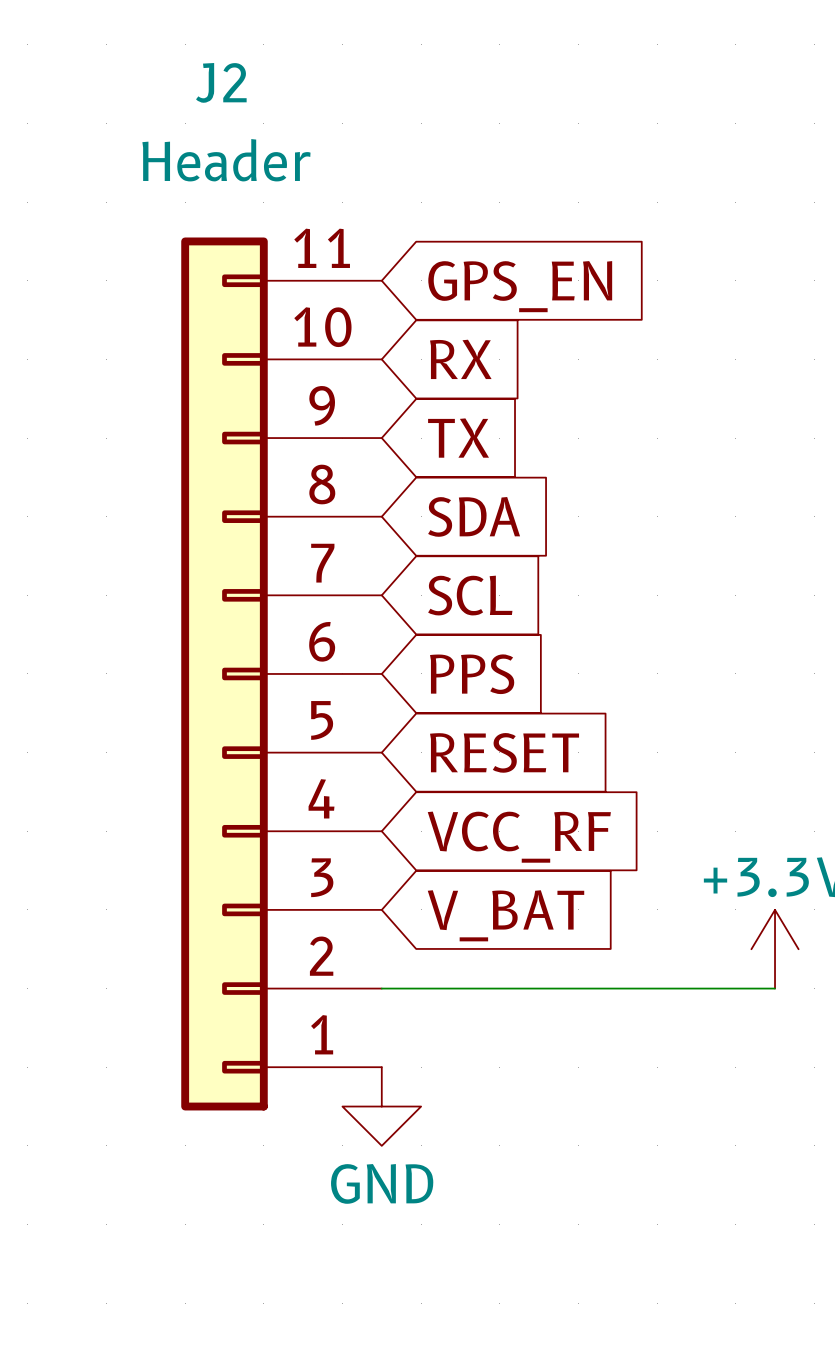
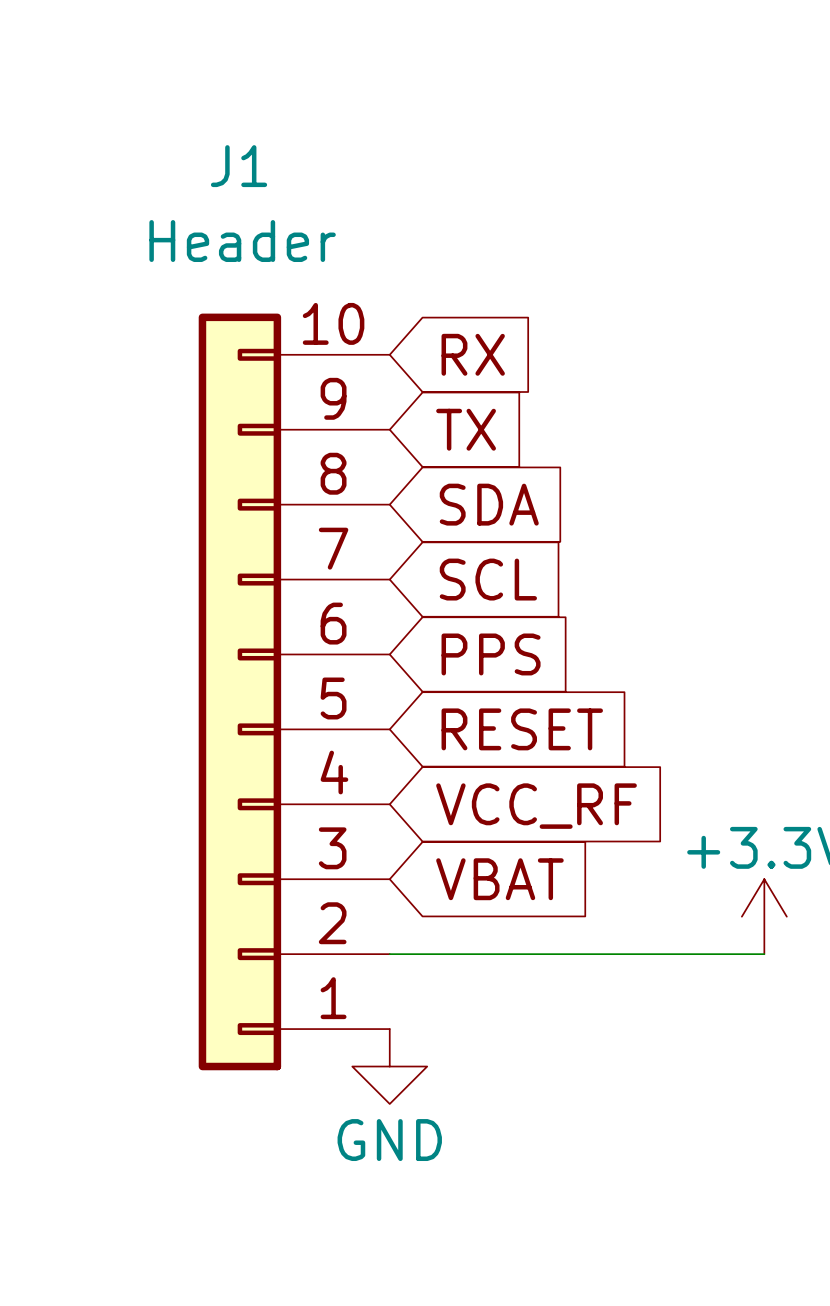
global label: GPS_EN (520, 286) -> none
J2: Header (281, 673) -> none
J1: none -> Header (294, 691)
global label: V_BAT (505, 915) -> VBAT (499, 879)

